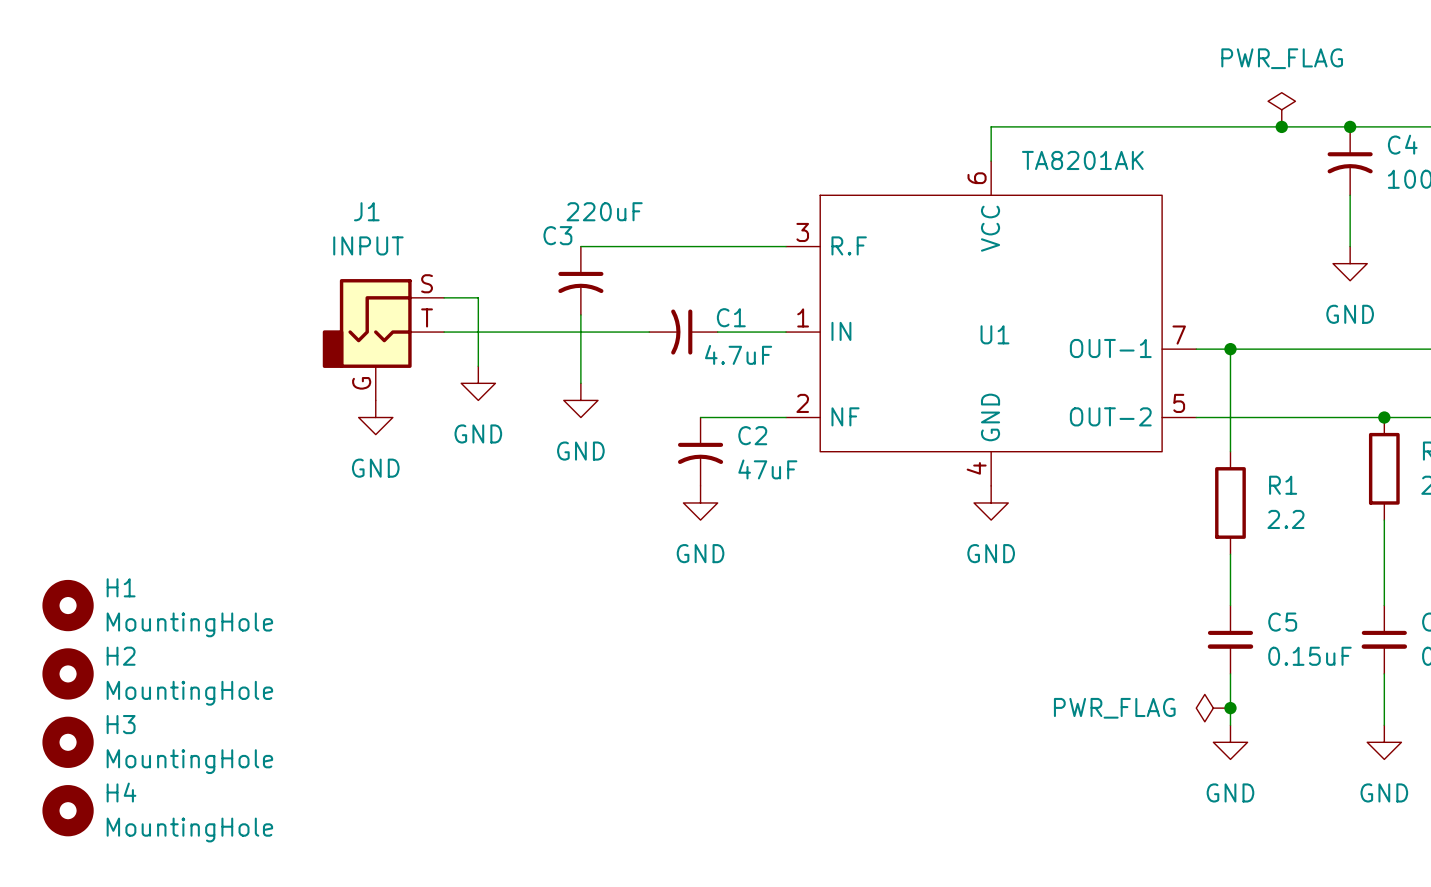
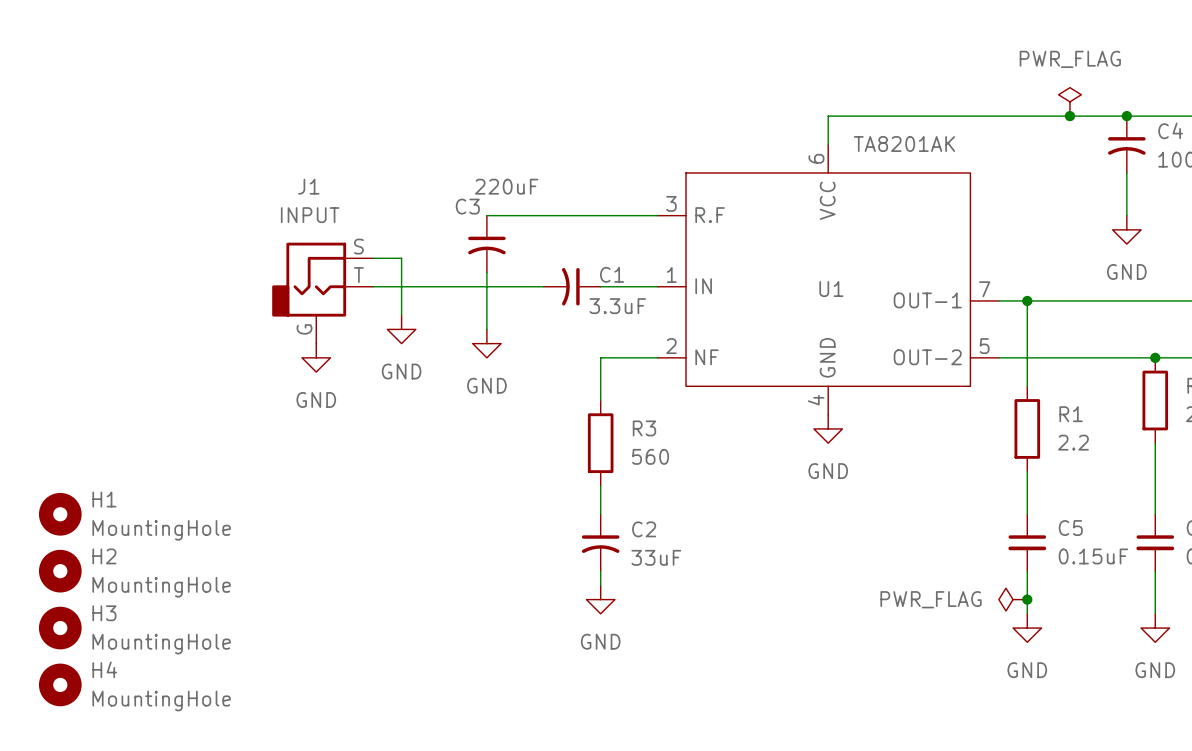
C1 value: 4.7uF (738, 354) -> 3.3uF (617, 306)
wire: (700, 417) (717, 417) -> (600, 400) (600, 357)
C2 position: (700, 451) -> (600, 542)
C2 value: 47uF (767, 469) -> 33uF (656, 557)
power symbol position: GND (700, 502) -> GND (600, 599)
R3: none -> 560 (600, 443)
wire: none -> (600, 485) (600, 514)
wire: none -> (600, 571) (600, 585)

